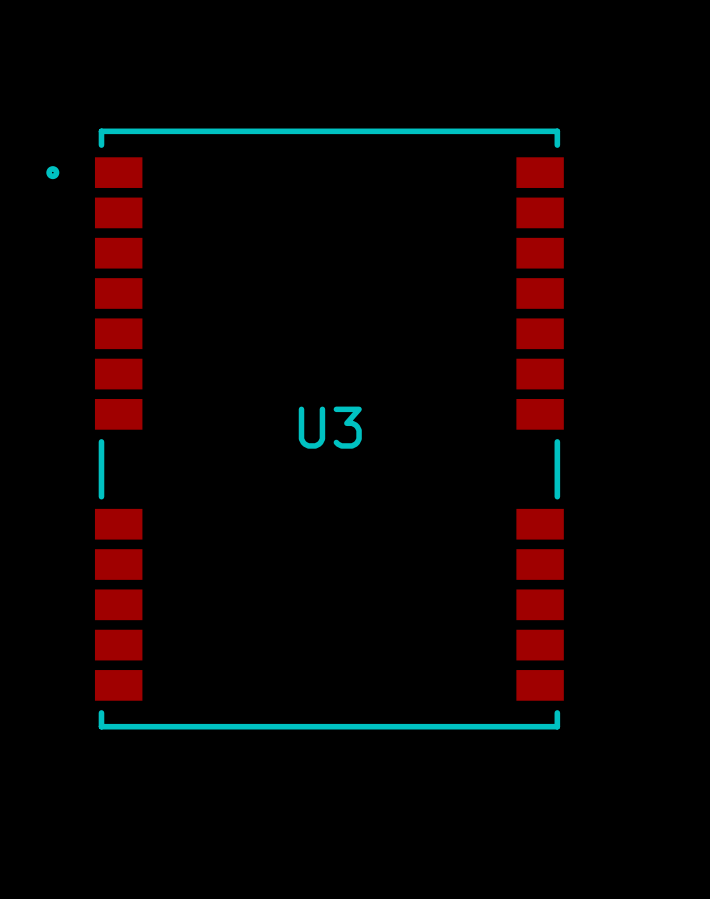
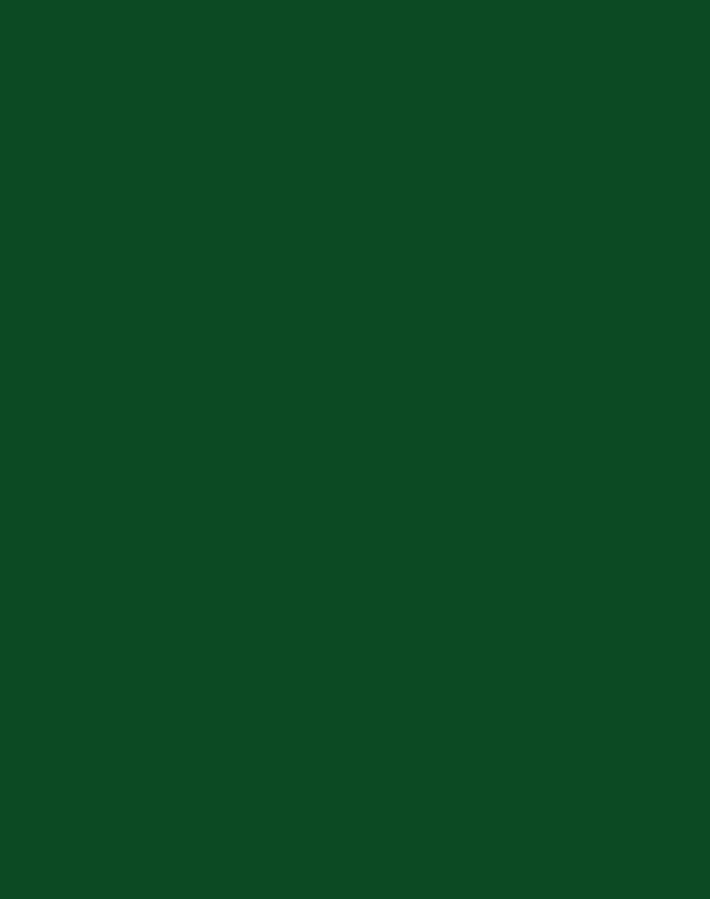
U3: (305, 429) -> none

